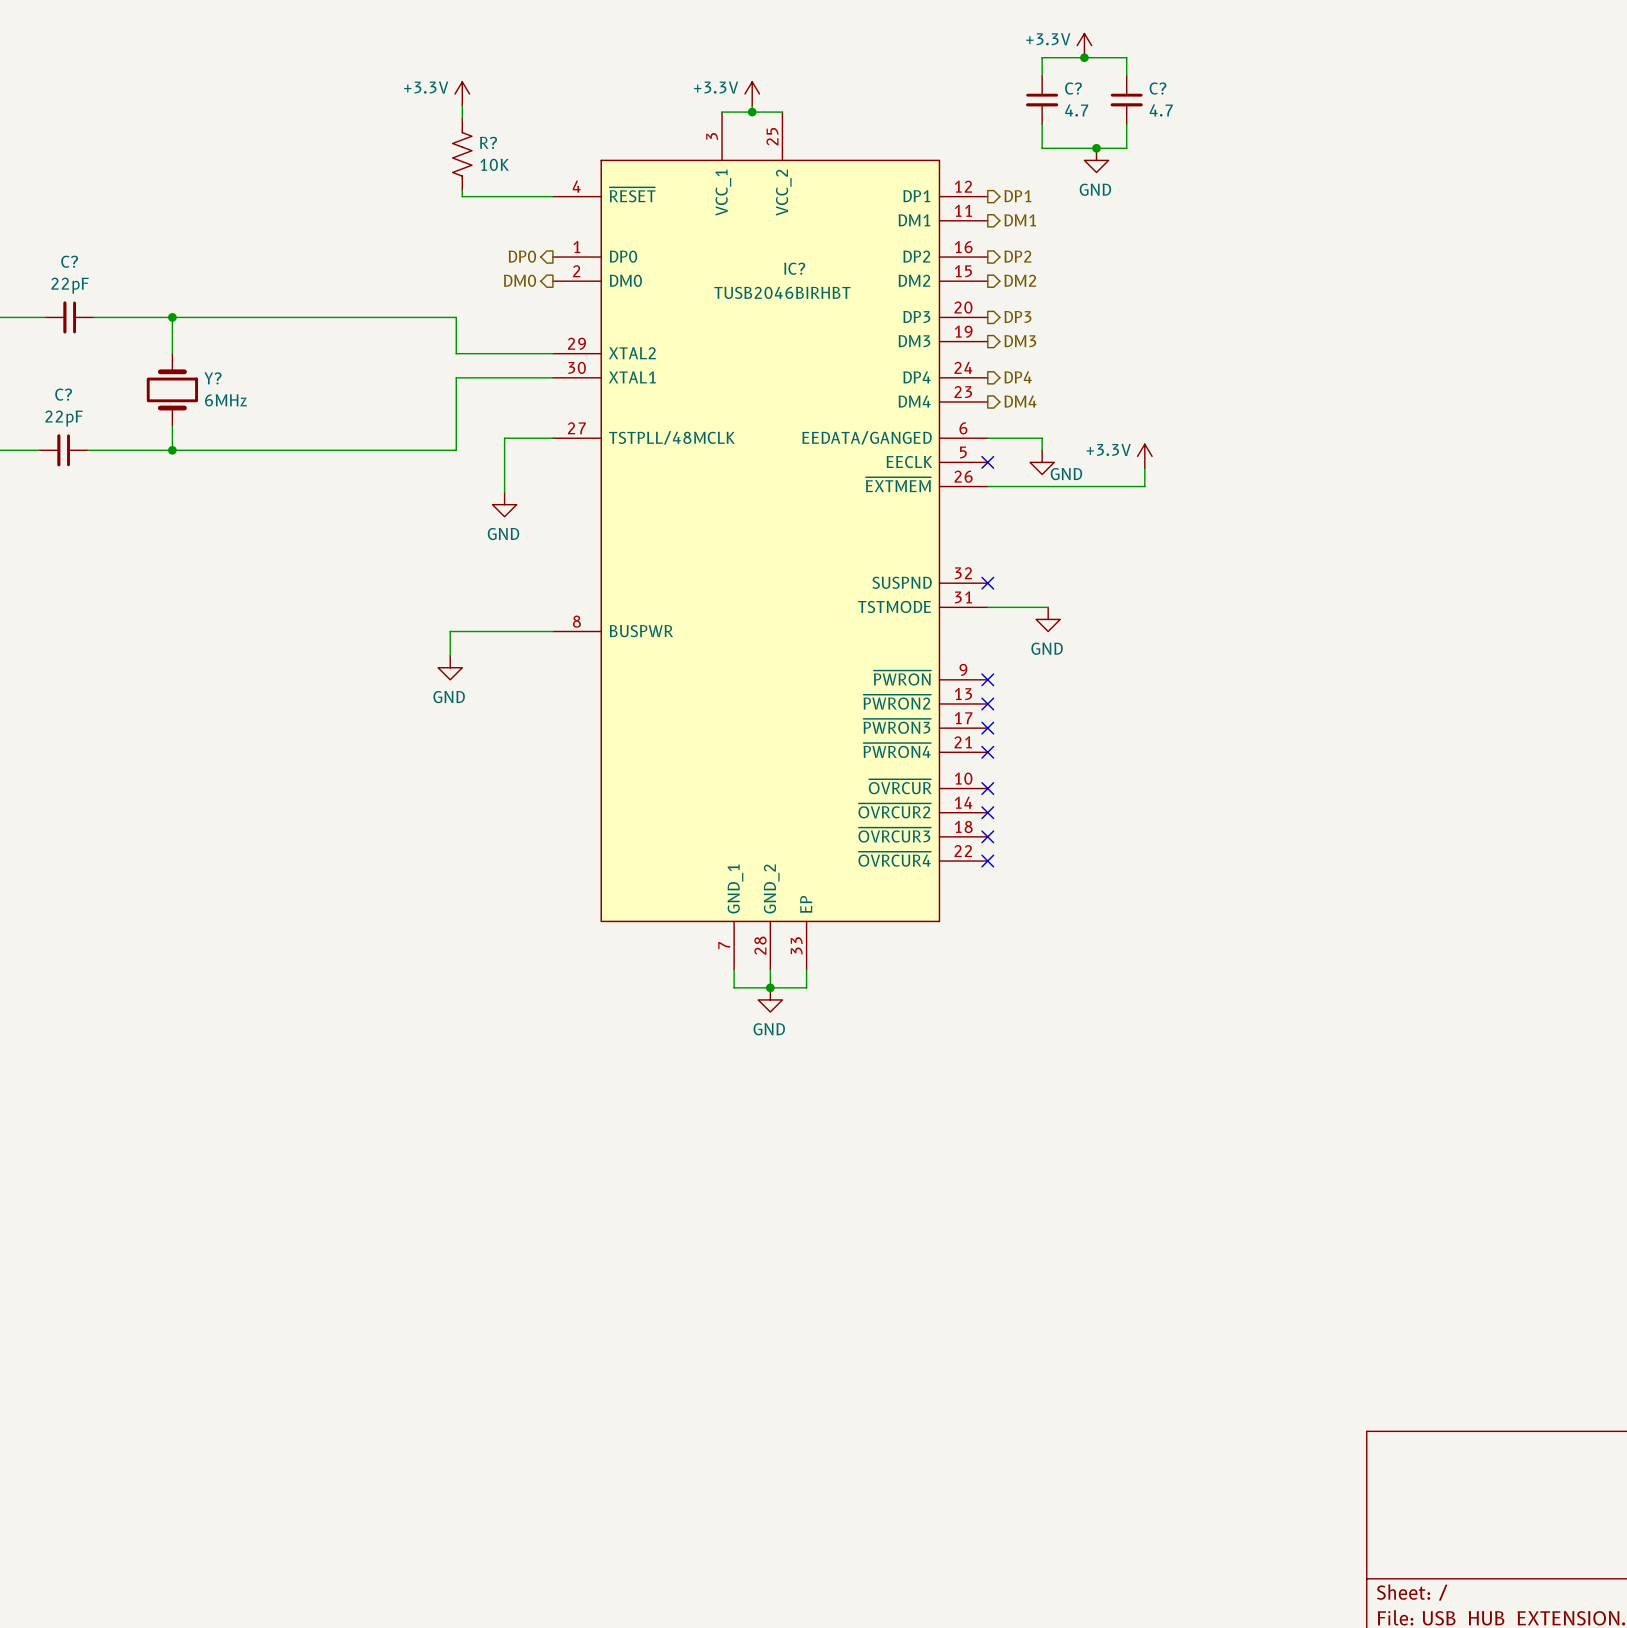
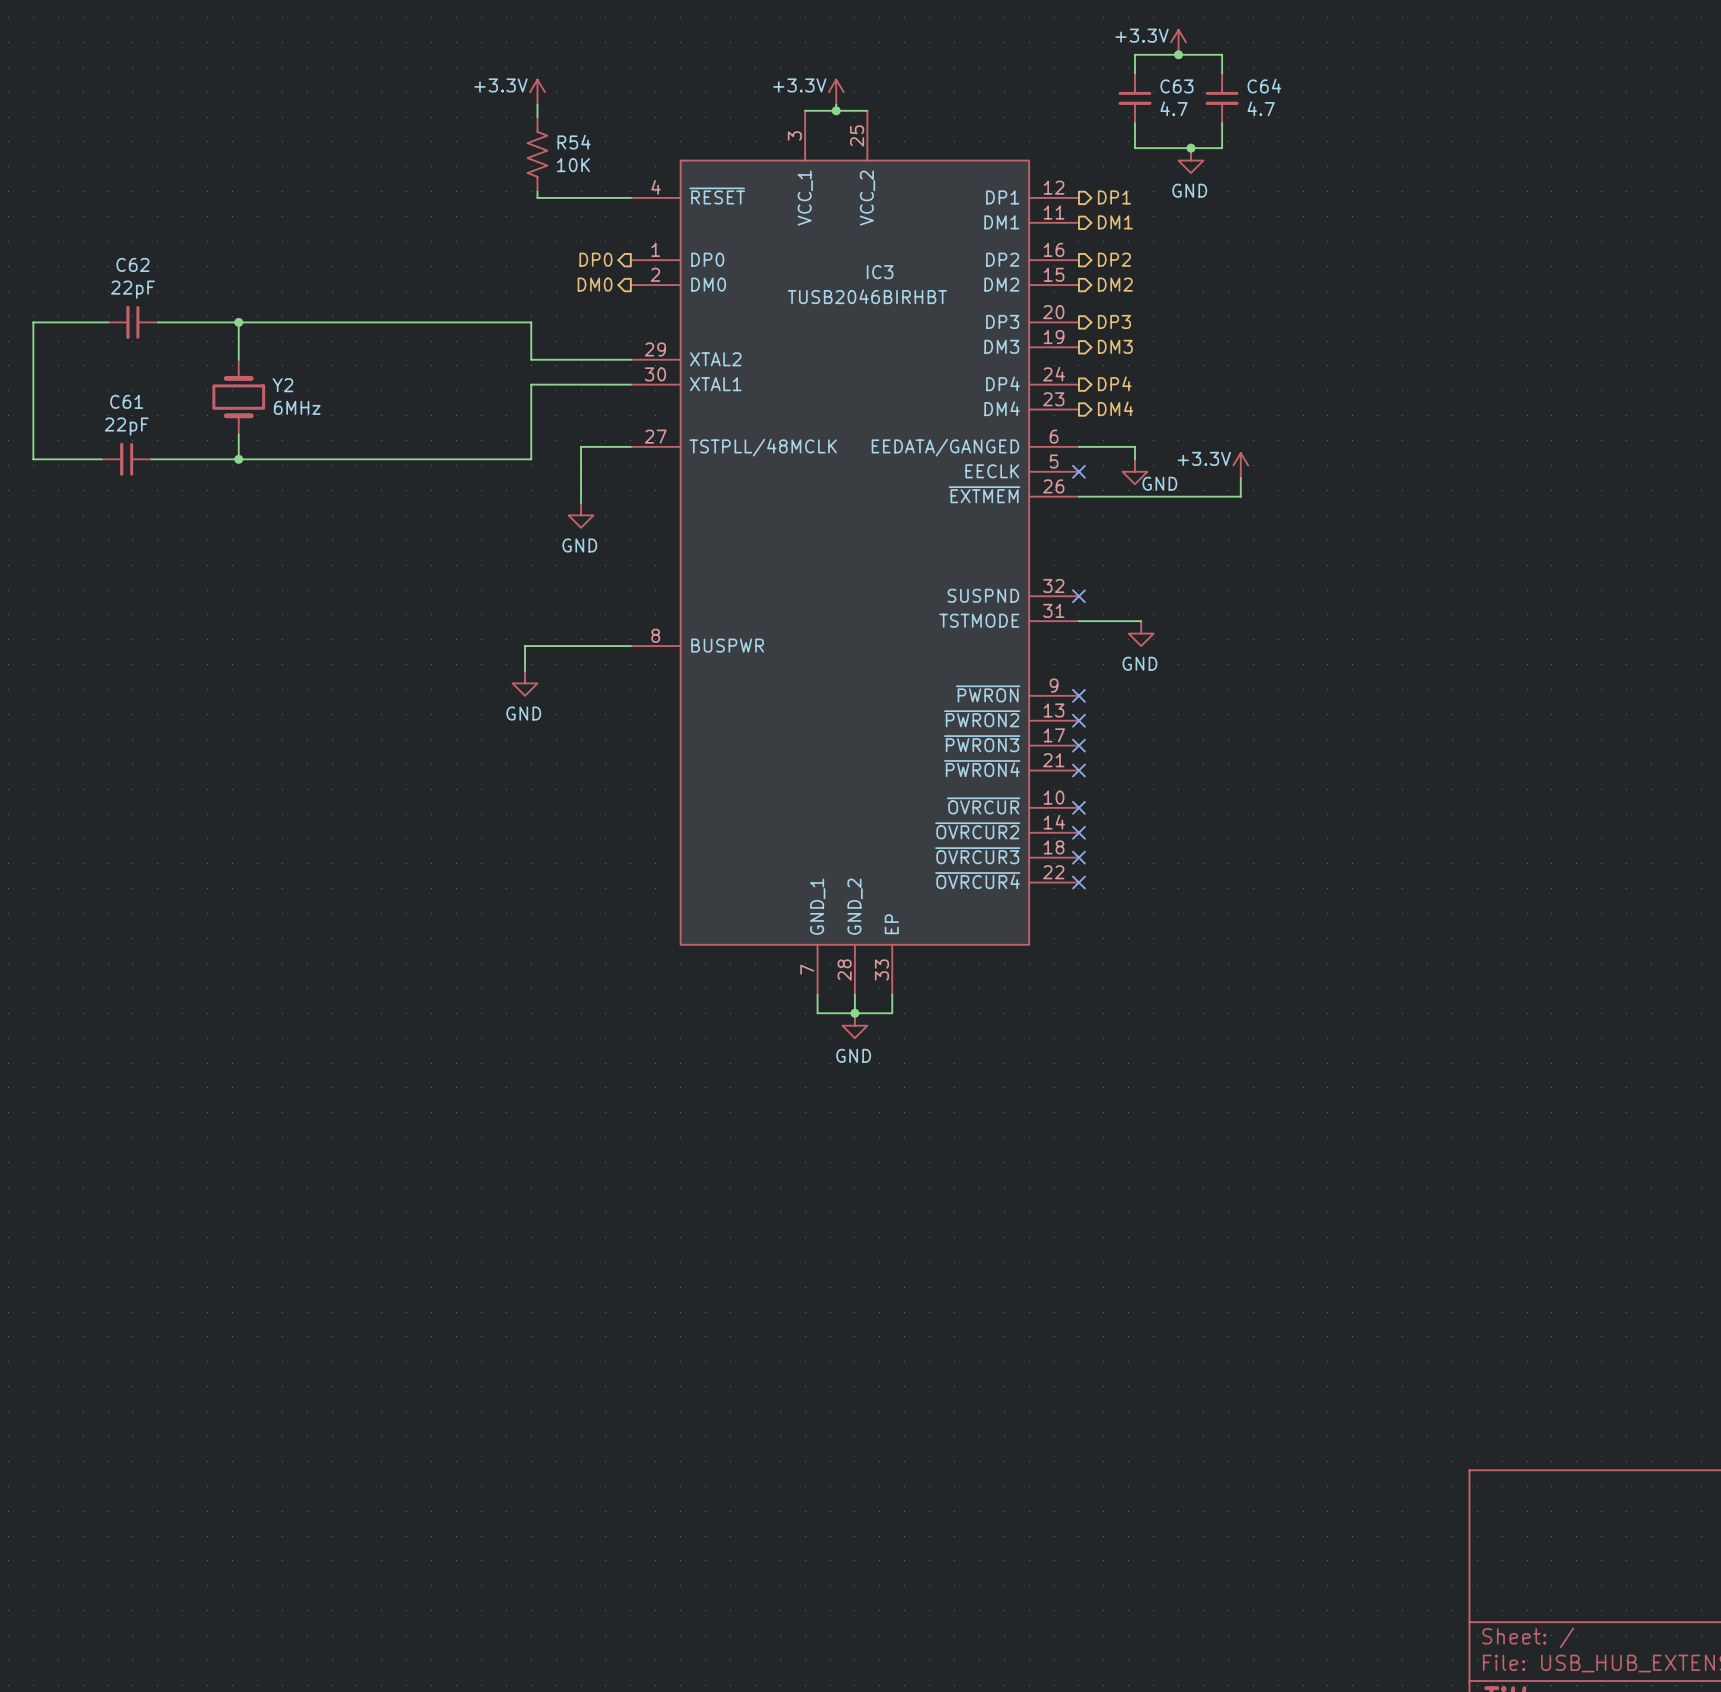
C? name: C? (1073, 88) -> C63 (1176, 86)
C? name: C? (1158, 88) -> C64 (1264, 86)
R? name: R? (488, 142) -> R54 (574, 142)
C? name: C? (69, 261) -> C62 (132, 264)
IC? name: IC? (794, 268) -> IC3 (880, 272)
Y? name: Y? (213, 378) -> Y2 (283, 385)
C? name: C? (63, 394) -> C61 (126, 401)

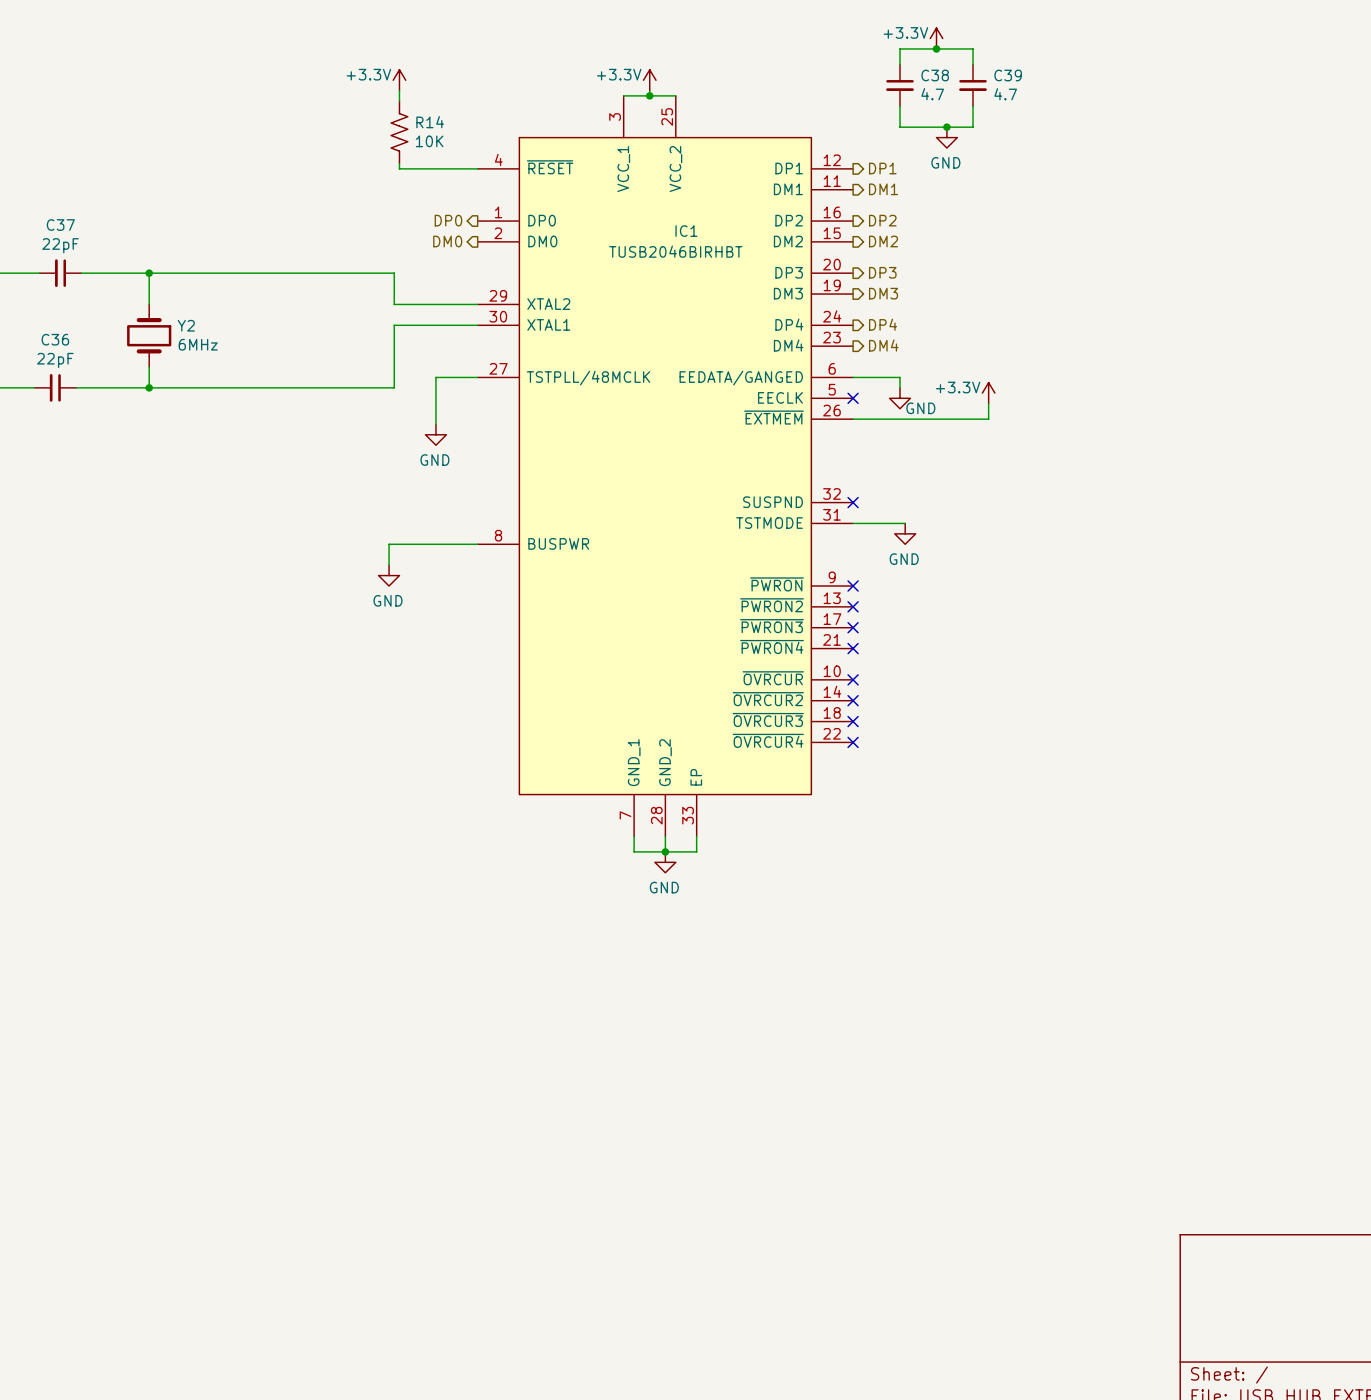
C63 name: C63 (1176, 86) -> C38 (935, 75)
C64 name: C64 (1264, 86) -> C39 (1008, 75)
R54 name: R54 (574, 142) -> R14 (430, 122)
C62 name: C62 (132, 264) -> C37 (60, 225)
IC3 name: IC3 (880, 272) -> IC1 (686, 231)
C61 name: C61 (126, 401) -> C36 (55, 339)

